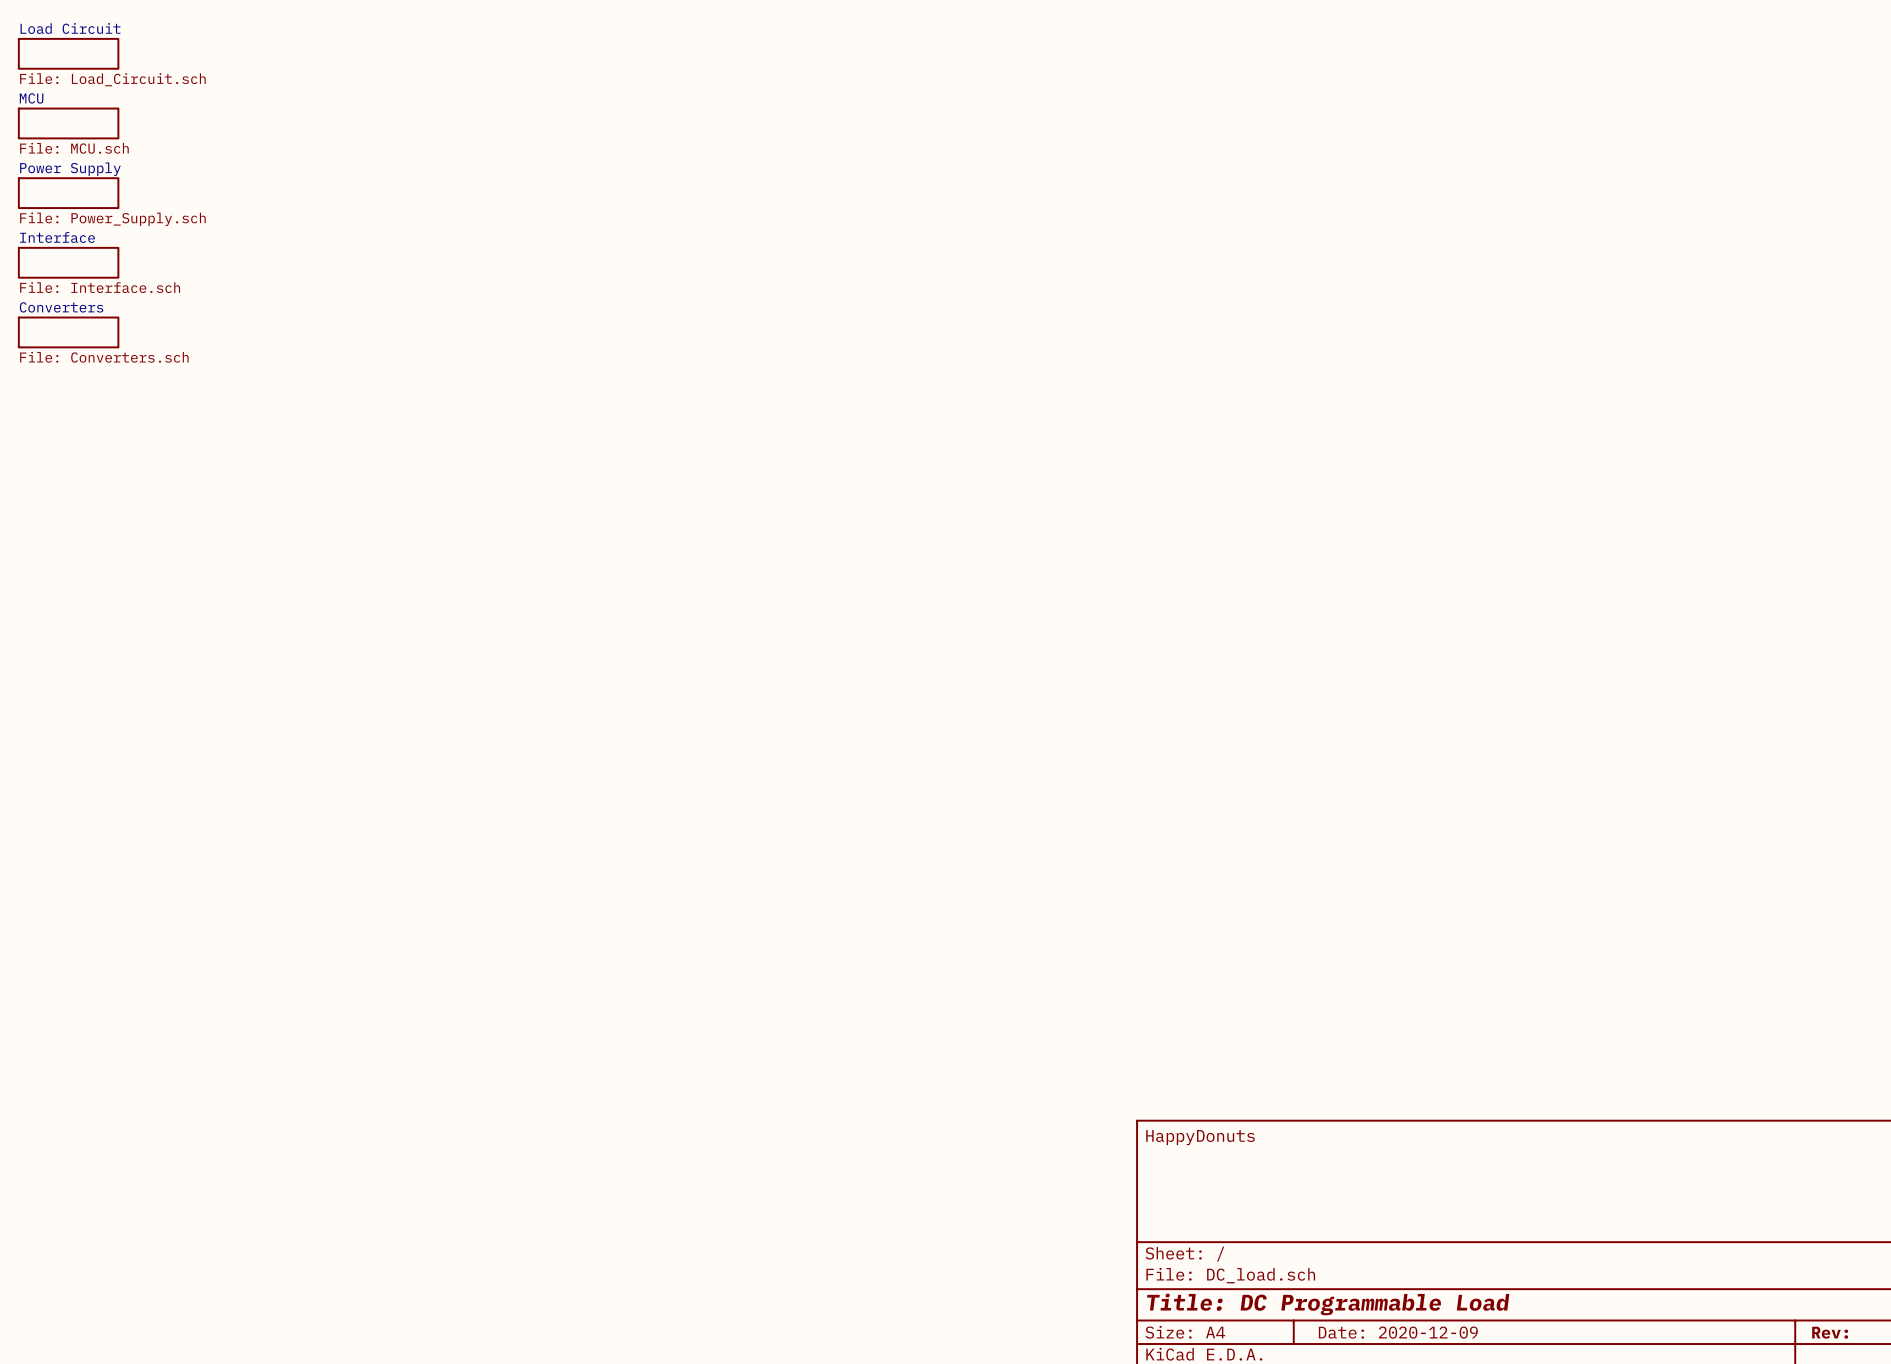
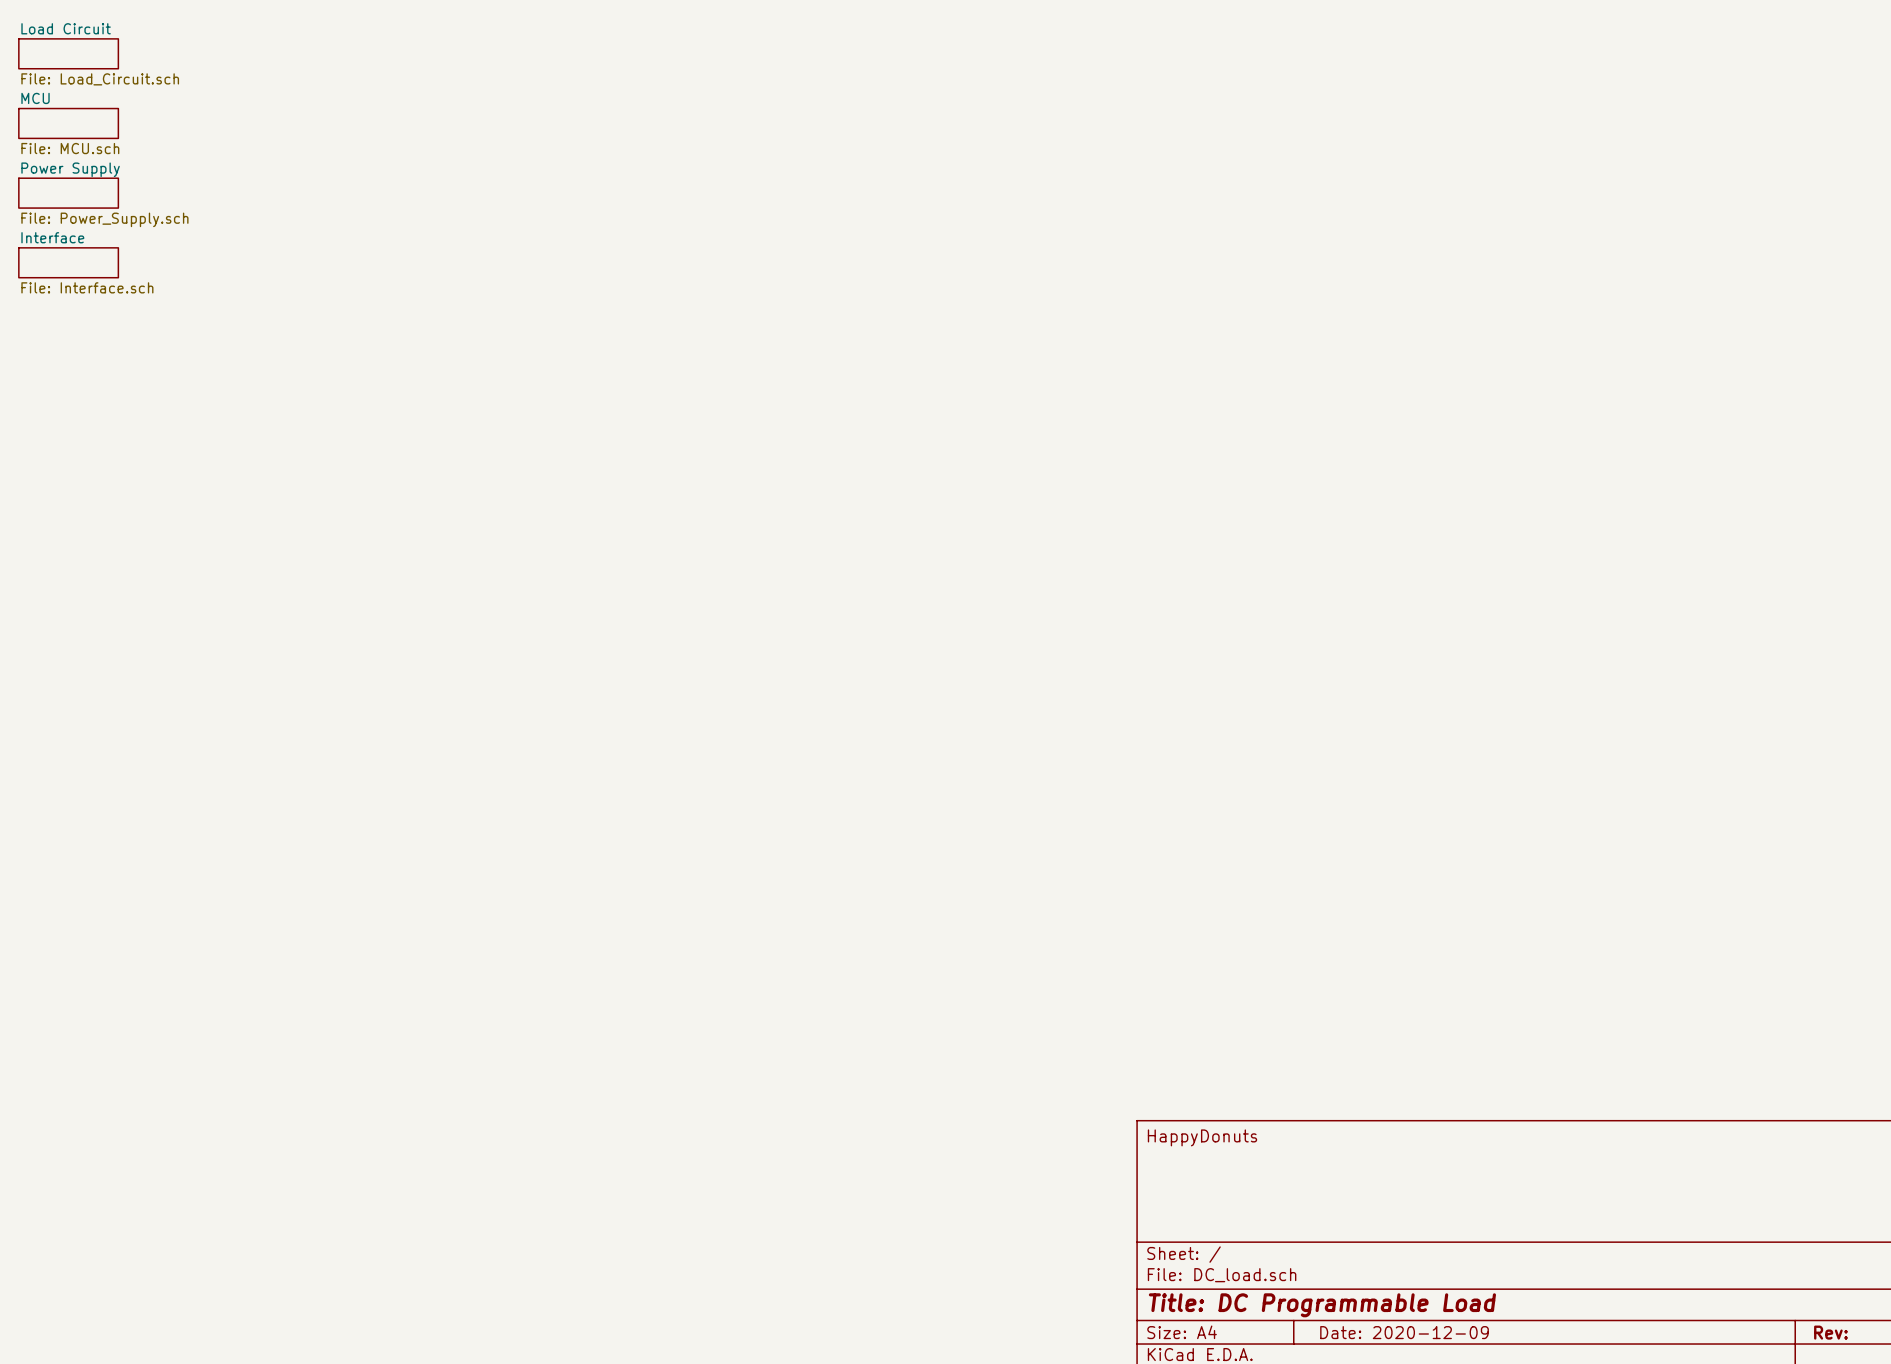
sheet Converters: File: Converters.sch (68, 332) -> none

